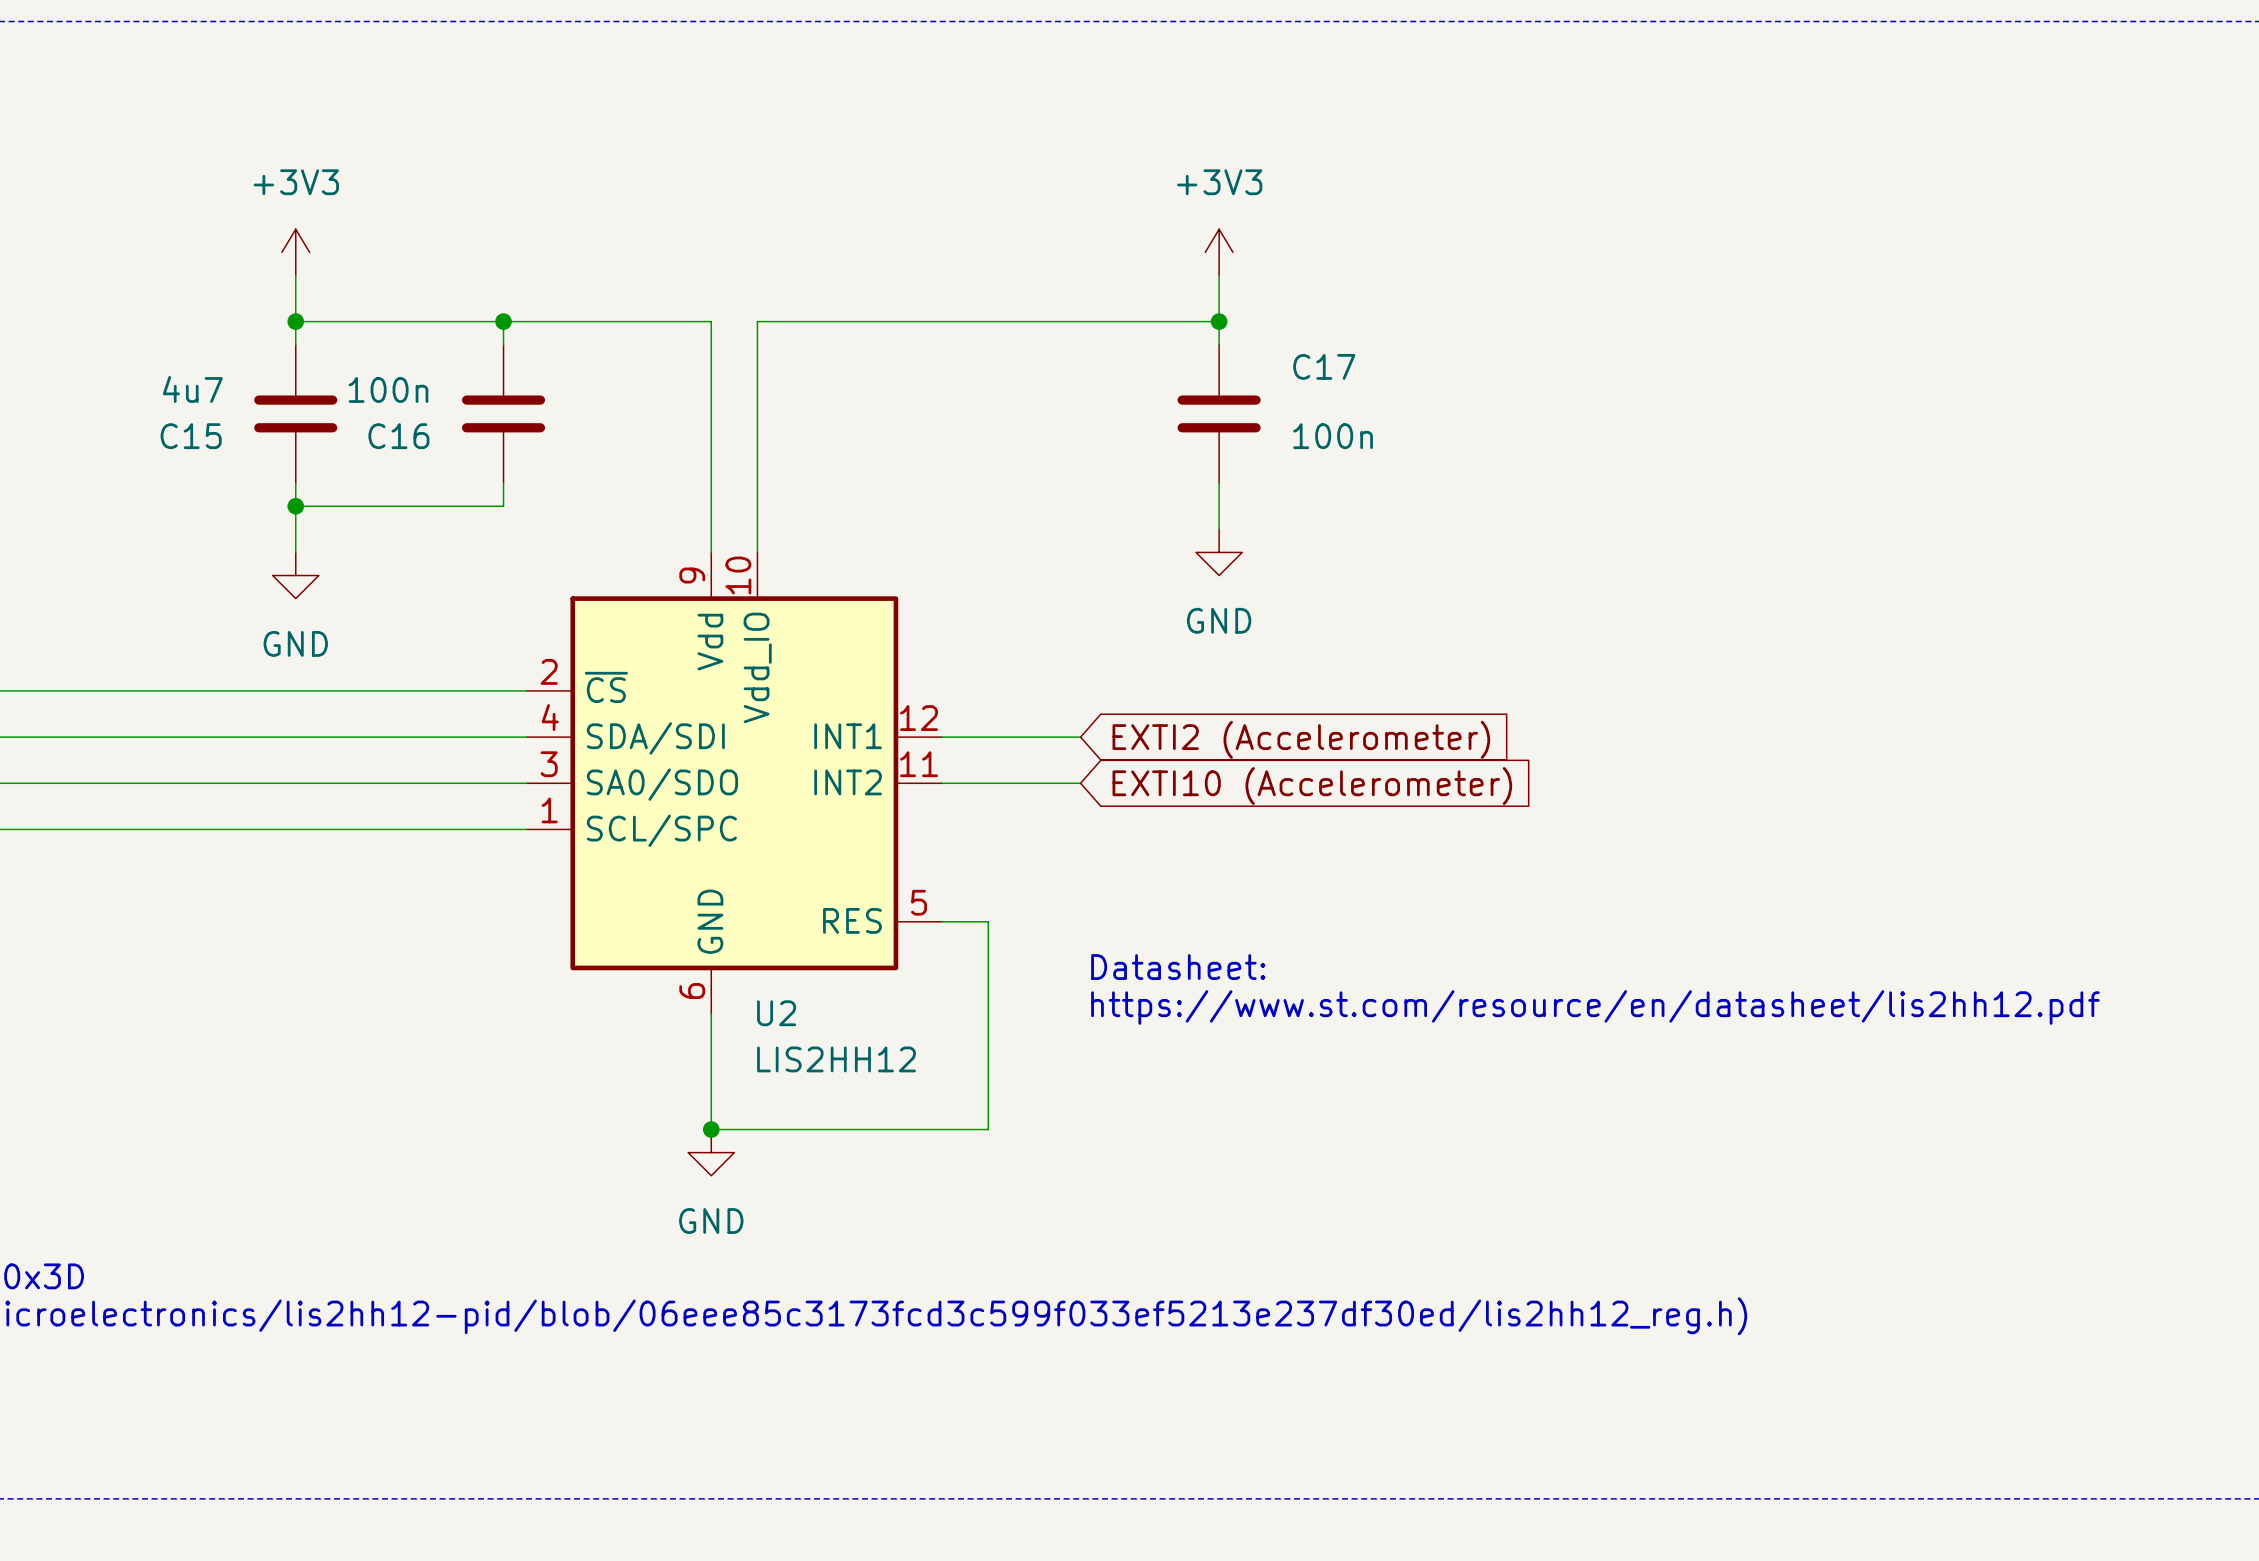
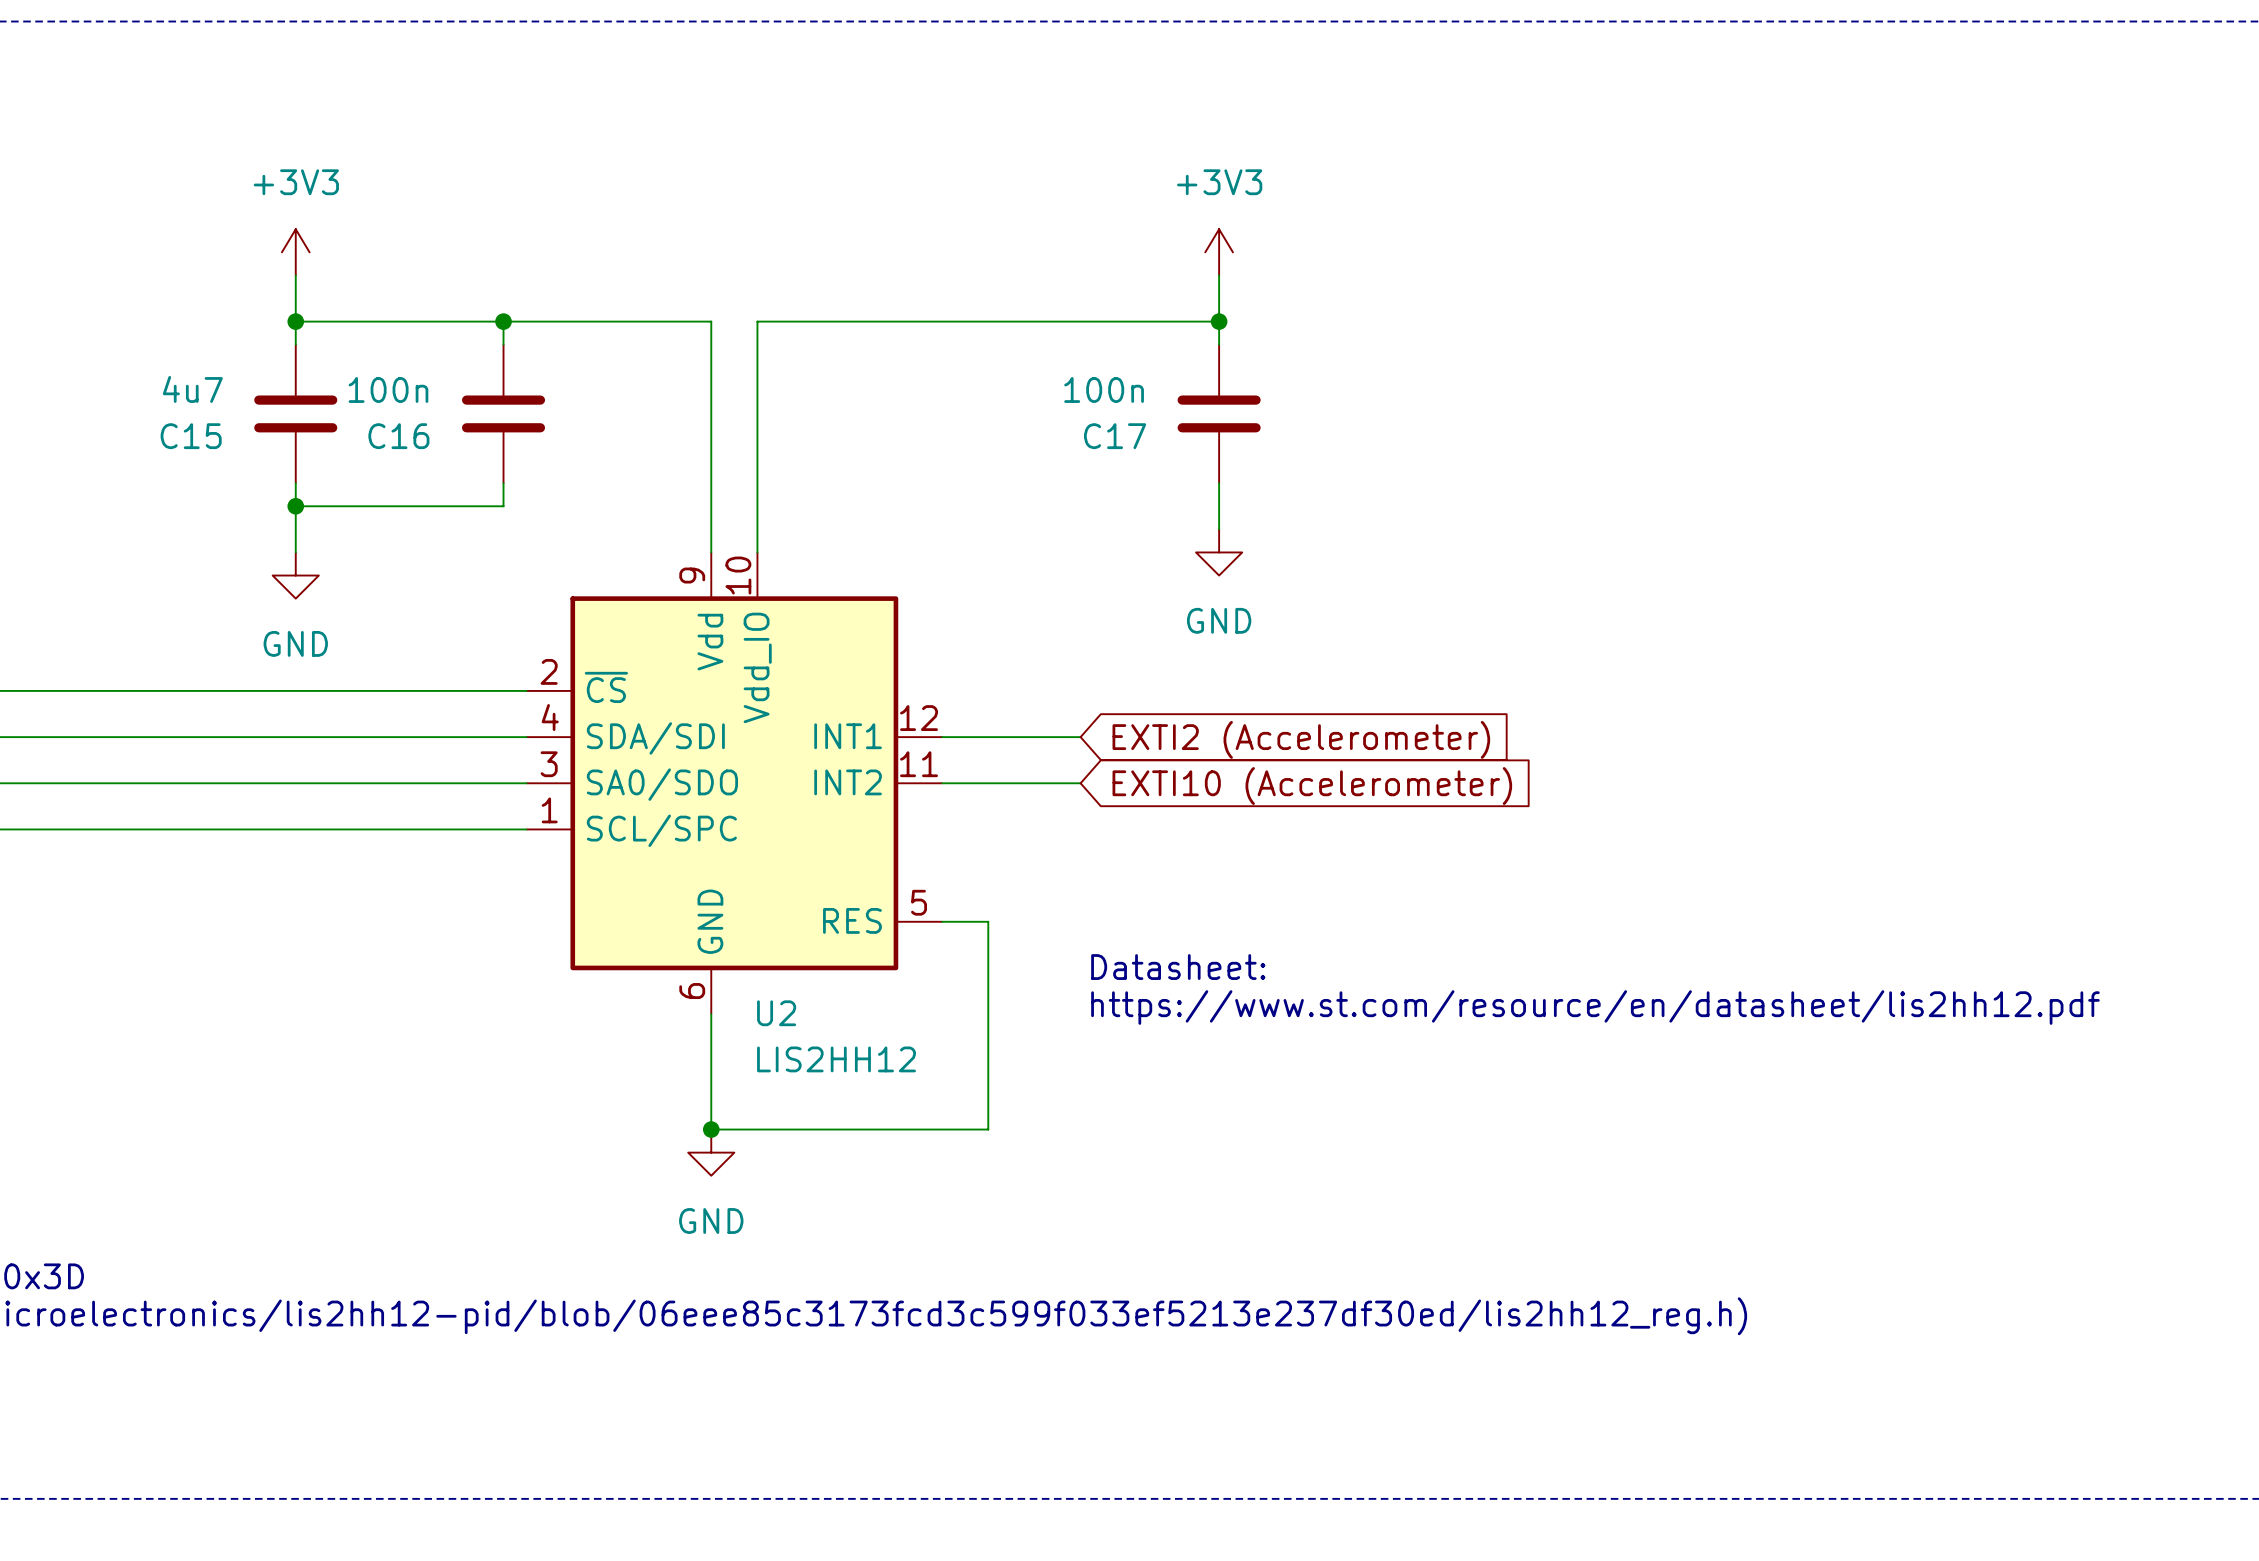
C17 name position: C17 (1324, 366) -> C17 (1115, 436)
C17 value position: 100n (1333, 436) -> 100n (1104, 389)

